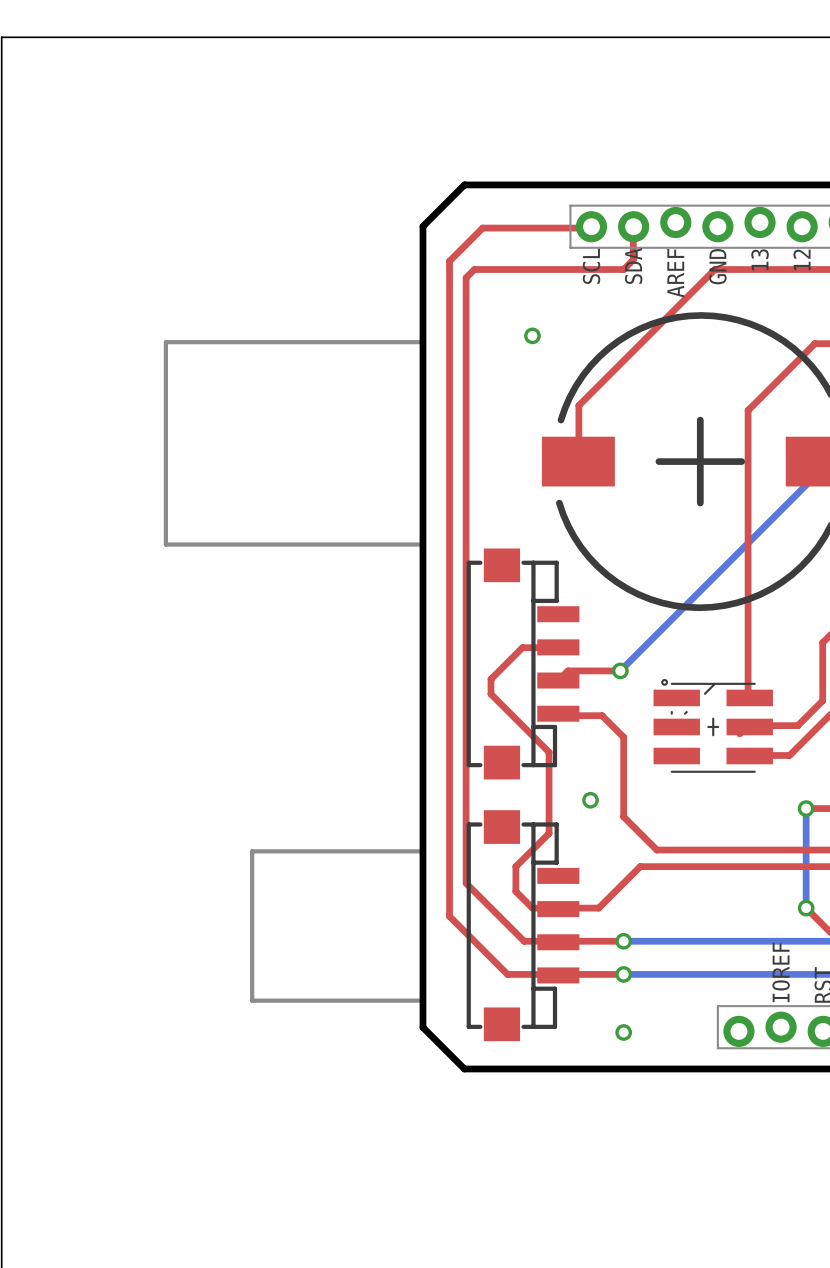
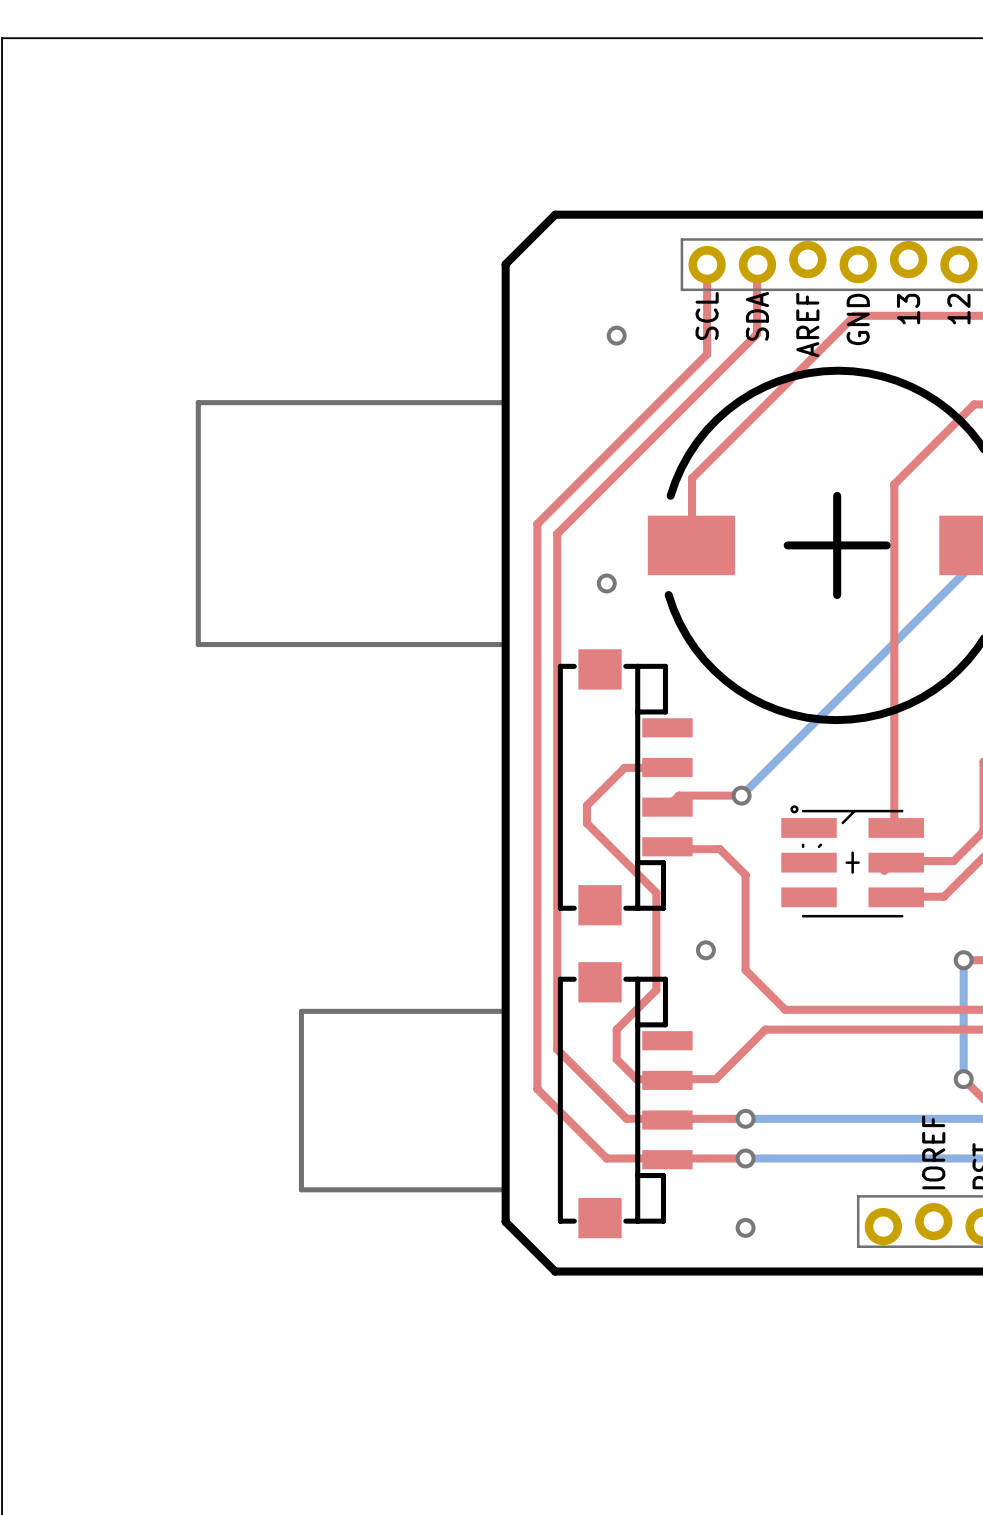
top track: (591, 226) (482, 228) (449, 261) (449, 443) -> (707, 264) (707, 354) (537, 523)
top track: (633, 259) (623, 269) (474, 269) (466, 277) (466, 451) -> (757, 304) (757, 334) (557, 533)
via position: (532, 335) -> (616, 335)
via: none -> (606, 583)

